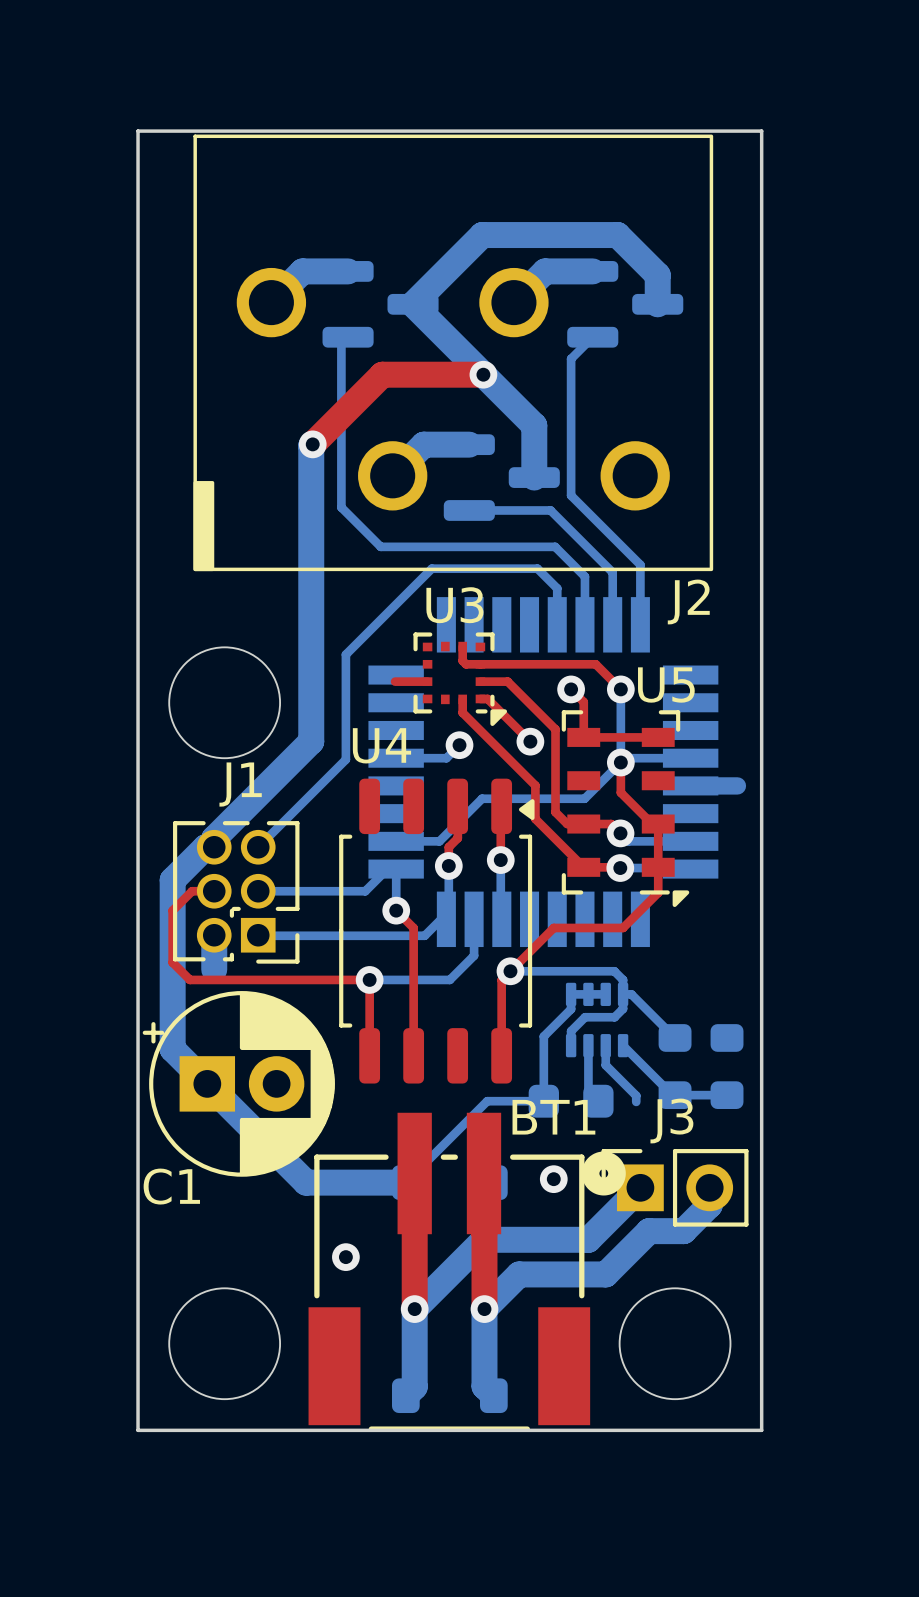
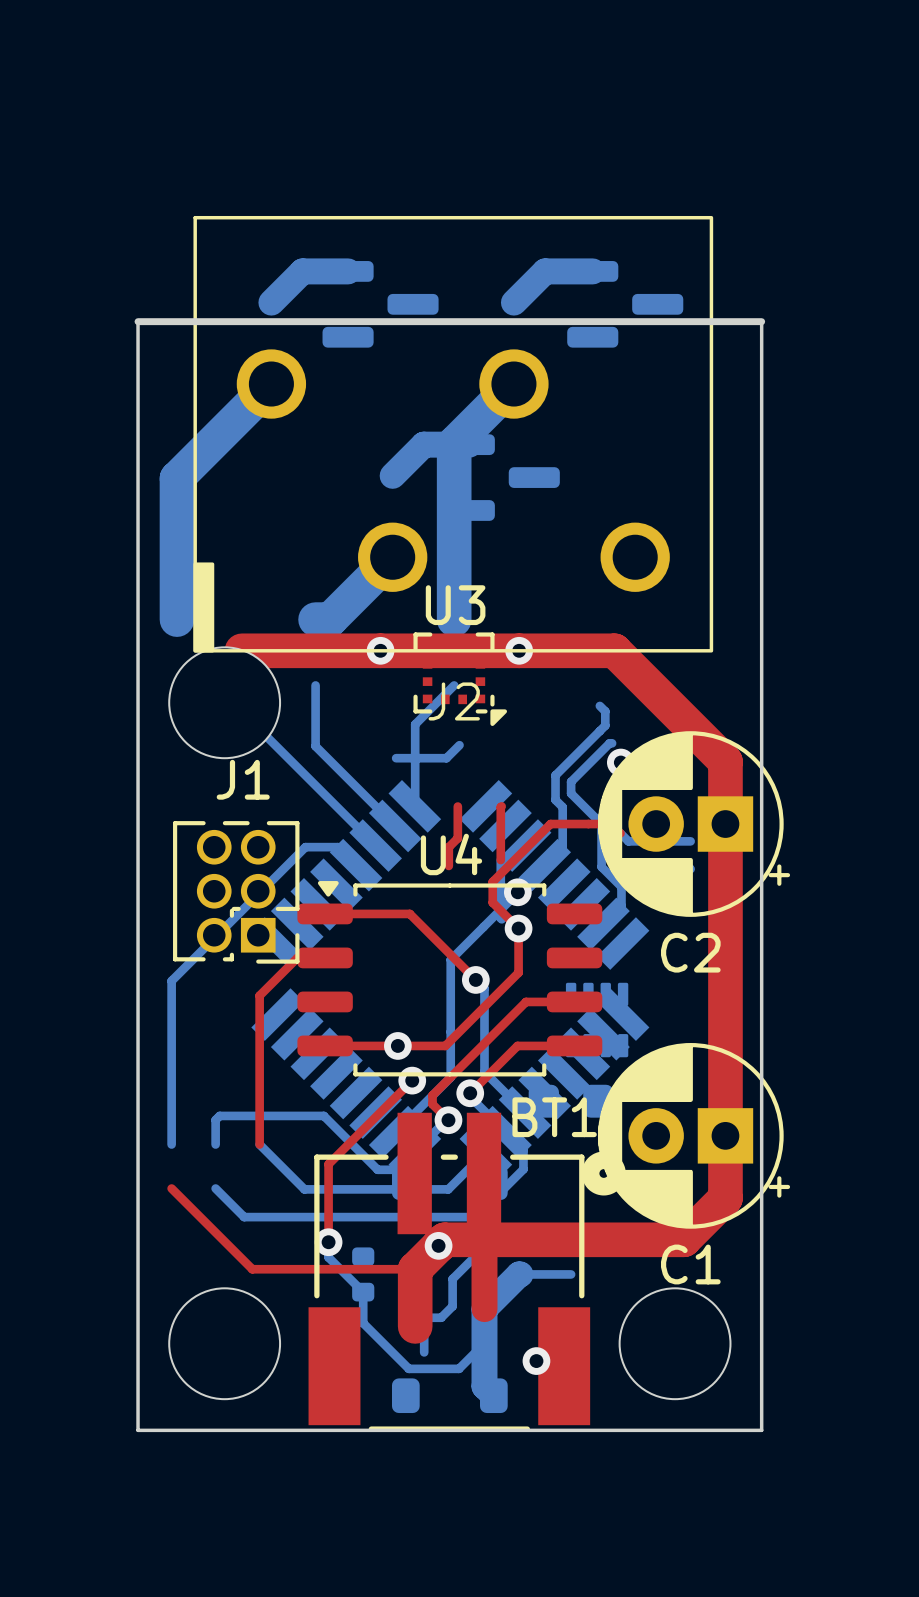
bottom track: (657, 304) (657, 275) (617, 235) (482, 235) (413, 304) (534, 425) (534, 477) -> none
board edge: (138, 321) (138, 131) (761, 131) (761, 321) -> (138, 321) (761, 321)
bottom track: (348, 337) (341, 343) (341, 507) (380, 546) (555, 546) (584, 576) (584, 624) -> none
bottom track: (592, 337) (571, 358) (571, 495) (640, 564) (640, 624) -> none
J2 position: (453, 352) -> (453, 434)
top track: (483, 374) (382, 374) (312, 444) -> none
via: (483, 374) -> none
bottom track: none -> (271, 384) (177, 478) (177, 619)
bottom track: none -> (513, 384) (454, 443) (454, 619)
bottom track: (312, 444) (311, 741) (214, 838) (214, 847) (205, 847) (172, 880) (172, 1049) (306, 1182) (405, 1182) (487, 1101) (543, 1101) (543, 1036) (571, 1009) (571, 994) (605, 994) -> none
via: (312, 444) -> none
bottom track: (469, 510) (550, 510) (612, 572) (612, 624) -> none
bottom track: none -> (392, 557) (330, 619) (315, 619)
J2 name position: J2 (688, 601) -> J2 (454, 701)
bottom track: (557, 624) (557, 588) (537, 568) (431, 568) (345, 654) (345, 759) (258, 847) -> none
top track: (462, 646) (462, 660) (466, 664) (595, 664) (620, 689) -> none
top track: none -> (241, 650) (614, 650) (725, 761) (725, 1198) (683, 1239) (444, 1239) (415, 1269)
via: none -> (380, 650)
via: none -> (519, 650)
top track: (395, 681) (427, 681) -> none
top track: (480, 681) (507, 681) (555, 729) (555, 812) (567, 824) -> (325, 1045) (445, 1045) (518, 972) (518, 928) (492, 902) (492, 881) (550, 824) (567, 824)
bottom track: none -> (177, 685) (215, 685) (376, 845)
bottom track: none -> (315, 685) (315, 746) (395, 826)
bottom track: none -> (454, 685) (415, 724) (415, 806)
top track: (571, 689) (583, 702) (583, 737) (658, 737) -> none
via: (571, 689) -> none
bottom track: (620, 689) (620, 762) -> none
via: (620, 689) -> none
top track: (480, 698) (487, 698) (530, 741) -> none
top track: (462, 699) (462, 712) (535, 785) (535, 819) (583, 867) (620, 868) -> none
bottom track: none -> (599, 705) (605, 711) (605, 725) (555, 775) (555, 800) (562, 807) (562, 847) (544, 865)
via: (530, 741) -> none
bottom track: none -> (612, 743) (609, 743) (571, 781) (571, 793) (601, 824) (601, 866) (621, 886) (621, 905) (603, 923)
U4 name position: U4 (381, 745) -> U4 (451, 854)
via: (459, 745) -> none
bottom track: (690, 758) (625, 758) (584, 798) (482, 798) (439, 841) (396, 841) -> none
top track: (620, 762) (620, 792) (658, 830) (658, 892) (623, 927) (553, 927) (501, 980) (501, 1055) -> none
part: (543, 772) -> none
bottom track: (690, 785) (737, 785) -> none
U5: (625, 808) -> none
C2: none -> (694, 824)
via: (620, 833) -> none
via: (500, 860) -> none
bottom track: none -> (356, 865) (338, 847) (305, 847) (171, 980) (171, 1144)
bottom track: (448, 865) (448, 916) (446, 919) (441, 919) (424, 935) (258, 935) -> none
via: (448, 865) -> none
bottom track: none -> (545, 865) (450, 959) (450, 1077) (395, 1132)
via: (620, 868) -> none
top track: (214, 891) (192, 891) (172, 910) (172, 962) (189, 979) (369, 979) (369, 1055) -> none
bottom track: (258, 891) (365, 891) (387, 869) (396, 869) (396, 910) -> none
via: none -> (517, 892)
top track: (396, 910) (413, 928) (413, 1055) -> none
via: (396, 910) -> none
top track: none -> (325, 913) (409, 913) (475, 979)
bottom track: (474, 919) (474, 955) (449, 979) (369, 979) -> none
via: none -> (518, 928)
U4 rotation: 0° (436, 931) -> 90° counterclockwise (449, 978)
bottom track: (214, 935) (214, 969) -> none
top track: none -> (325, 957) (297, 957) (259, 995) (259, 1144)
bottom track: (510, 971) (614, 971) (623, 979) (623, 1008) (614, 1017) (585, 1017) (571, 1031) (571, 1045) -> none
via: (510, 971) -> none
via: (369, 979) -> none
part: none -> (450, 979)
bottom track: none -> (475, 979) (484, 988) (484, 1071) (525, 1112)
via: none -> (475, 979)
bottom track: (623, 994) (631, 994) (675, 1037) -> none
top track: none -> (574, 1001) (526, 1001) (432, 1095) (432, 1104) (448, 1120)
via: none -> (397, 1045)
top track: none -> (574, 1045) (517, 1045) (470, 1093)
bottom track: (588, 1045) (588, 1091) (598, 1101) -> none
bottom track: (605, 1045) (605, 1065) (636, 1095) (636, 1101) -> none
bottom track: (623, 1045) (672, 1095) (727, 1095) -> none
part: (675, 1066) -> none
part: (727, 1066) -> none
top track: none -> (412, 1080) (328, 1164) (328, 1242)
via: none -> (412, 1080)
C1 rotation: 0° (238, 1083) -> 180° (694, 1135)
C1 position: (238, 1083) -> (694, 1135)
bottom track: none -> (470, 1093) (470, 1096) (523, 1150) (523, 1169) (475, 1217) (244, 1217) (215, 1188)
via: none -> (470, 1093)
bottom track: none -> (448, 1120) (396, 1169) (377, 1169) (323, 1115) (219, 1115) (215, 1120) (215, 1144)
via: none -> (448, 1120)
bottom track: none -> (259, 1144) (304, 1189) (448, 1189) (485, 1151)
top track: (414, 1173) (414, 1309) -> none
via: (553, 1179) -> none
bottom track: (640, 1187) (588, 1239) (483, 1239) (414, 1309) (414, 1386) (405, 1395) -> none
J3: (675, 1187) -> none
bottom track: (709, 1187) (709, 1205) (683, 1231) (649, 1231) (605, 1274) (571, 1274) -> none
top track: none -> (171, 1188) (252, 1269) (415, 1269)
bottom track: none -> (328, 1242) (328, 1257) (363, 1292) (363, 1323) (408, 1368) (459, 1368) (475, 1352)
via: none -> (438, 1245)
bottom track: none -> (484, 1247) (452, 1279) (452, 1306) (441, 1317) (424, 1317) (424, 1352)
via position: (345, 1257) -> (328, 1242)
top track: none -> (415, 1269) (415, 1326)
part: none -> (363, 1274)
bottom track width: thick (520, 1274) (571, 1274) -> thin (520, 1274) (571, 1274)
via: (414, 1309) -> none
via: (484, 1309) -> none
via: none -> (536, 1361)

